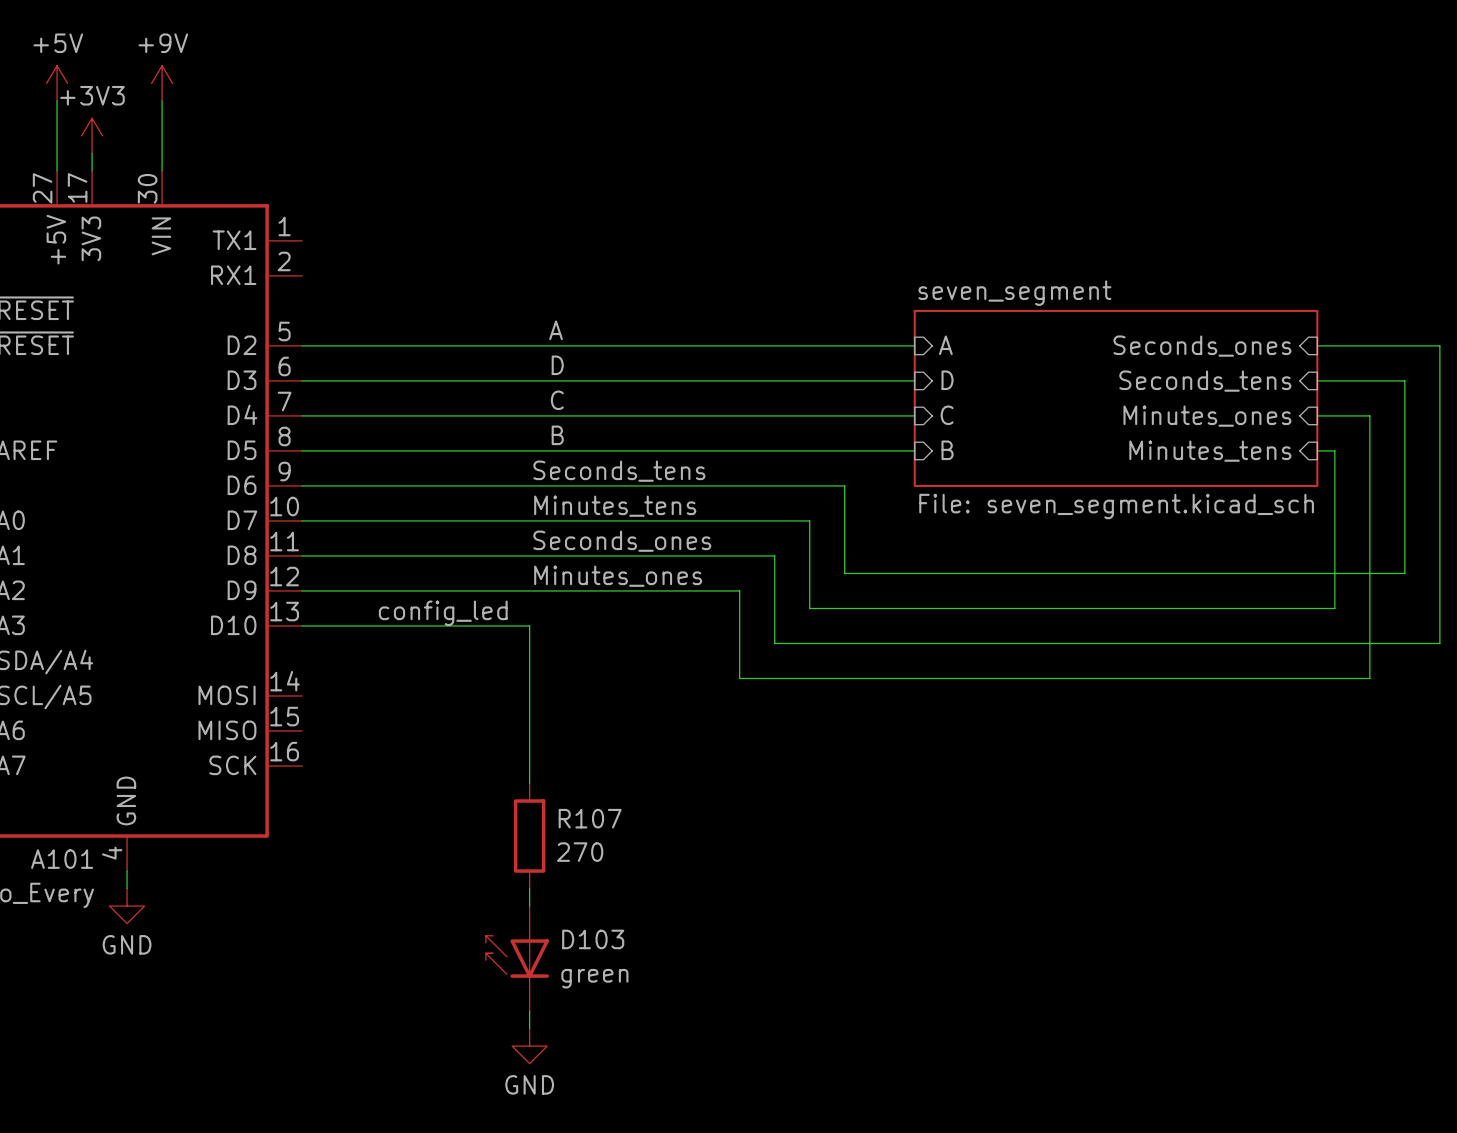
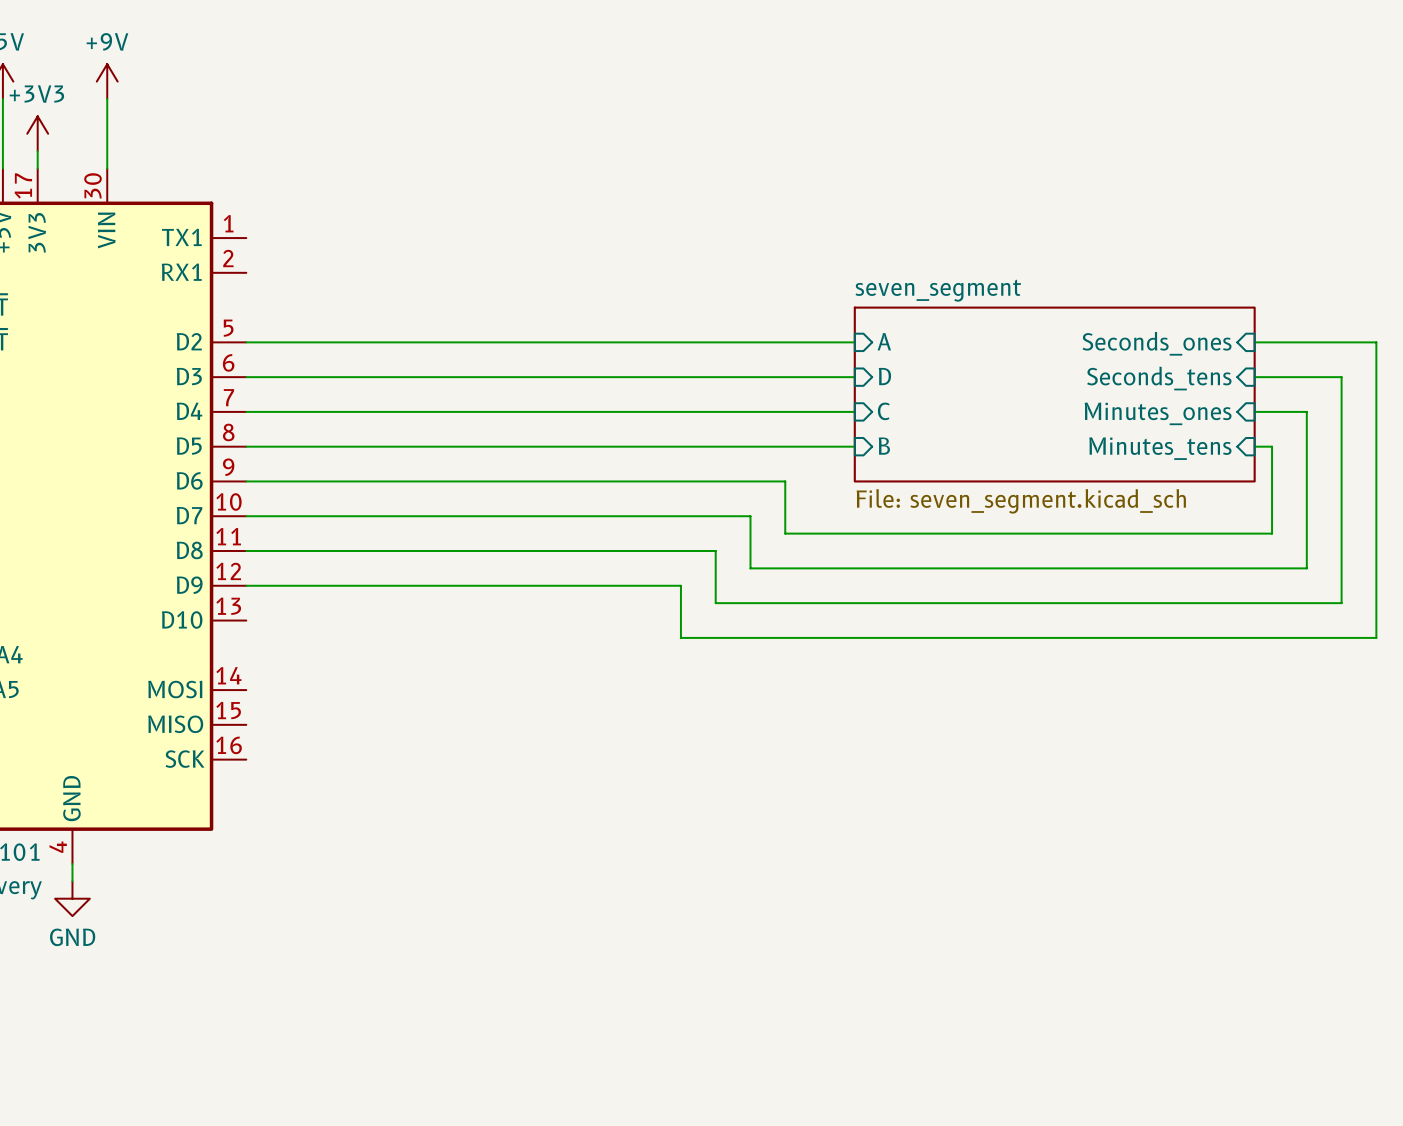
label: A (556, 330) -> none
label: D (557, 365) -> none
label: C (557, 400) -> none
label: B (557, 435) -> none
label: Seconds_tens (619, 471) -> none
label: Minutes_tens (615, 506) -> none
wire: (844, 538) (844, 573) -> (750, 568) (785, 568)
wire: none -> (785, 533) (1272, 533)
wire: (1334, 538) (1334, 608) -> (1341, 568) (1341, 603) (1272, 603)
label: Seconds_ones (622, 541) -> none
wire: (809, 573) (809, 608) -> (715, 603) (750, 603)
wire: (1404, 573) (1369, 573) (1369, 678) (739, 678) (739, 643) -> none
label: Minutes_ones (618, 576) -> none
wire: (774, 608) (774, 643) -> (680, 637) (715, 637)
label: config_led (443, 613) -> none
wire: (302, 625) (529, 625) (529, 783) -> none
R107: 270 (529, 836) -> none
wire: (529, 888) (529, 906) -> none
D103: green (517, 958) -> none
wire: (529, 1011) (529, 1028) -> none
power symbol: GND (529, 1046) -> none

